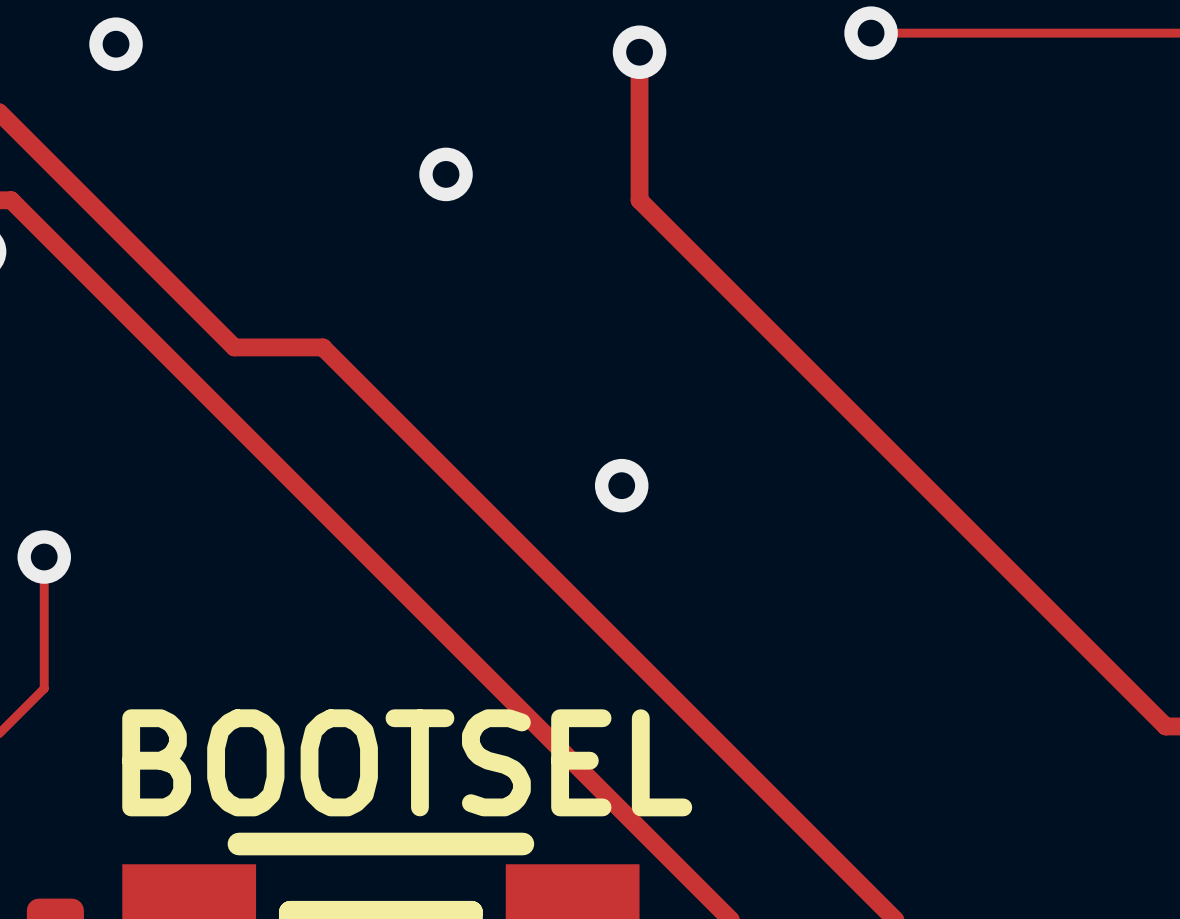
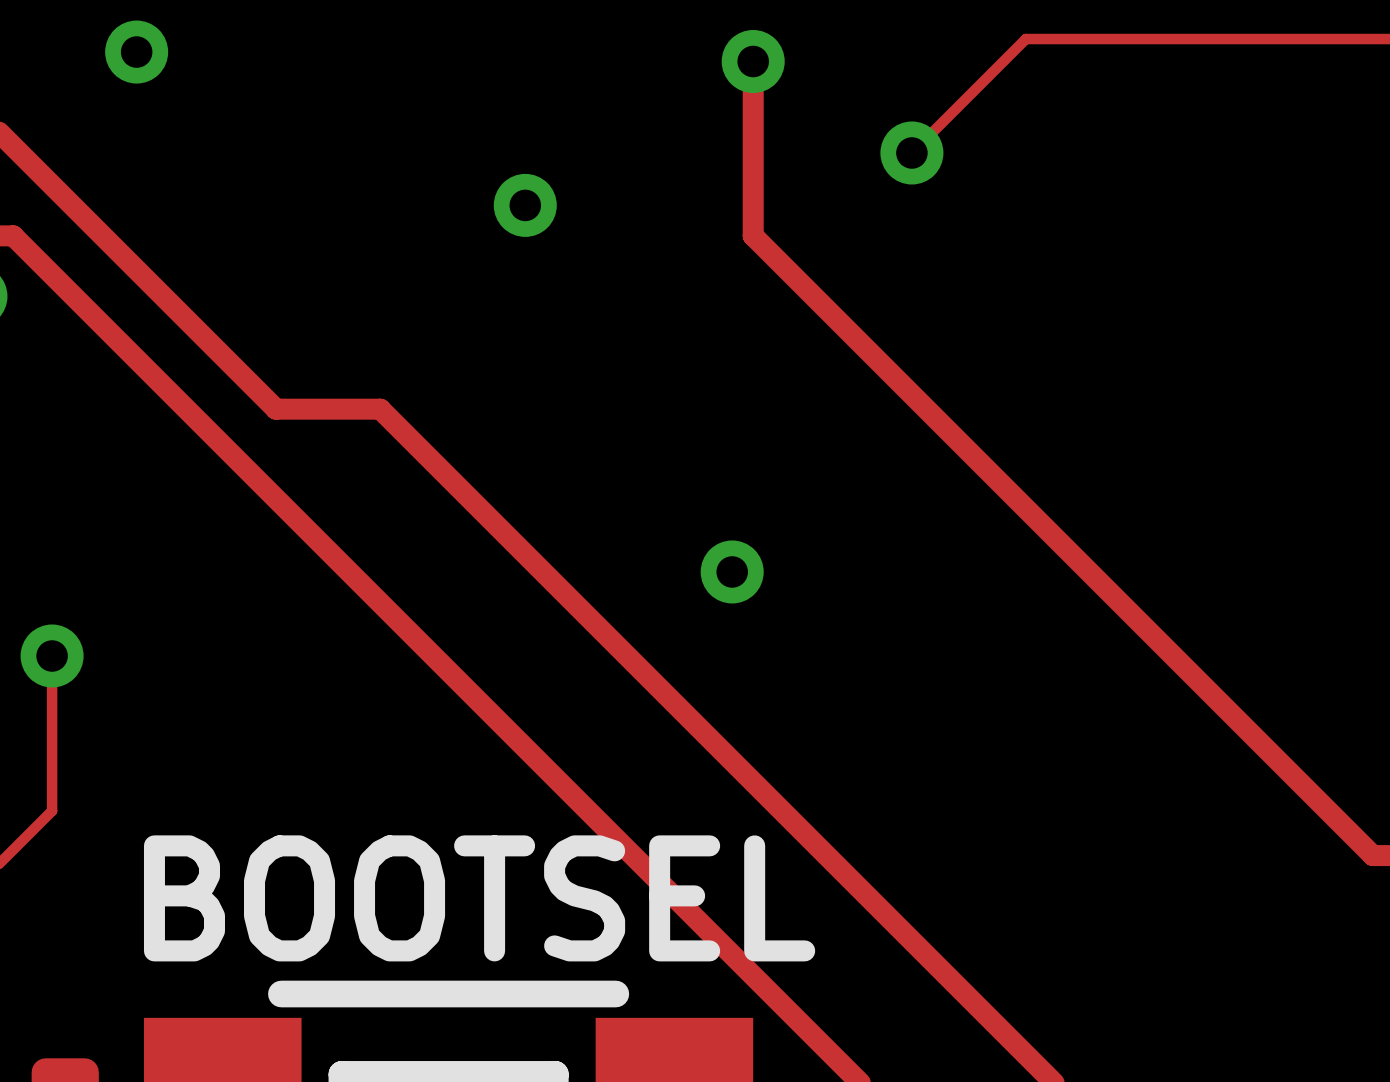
track: none -> (1025, 39) (911, 152)
via position: (871, 33) -> (911, 152)

